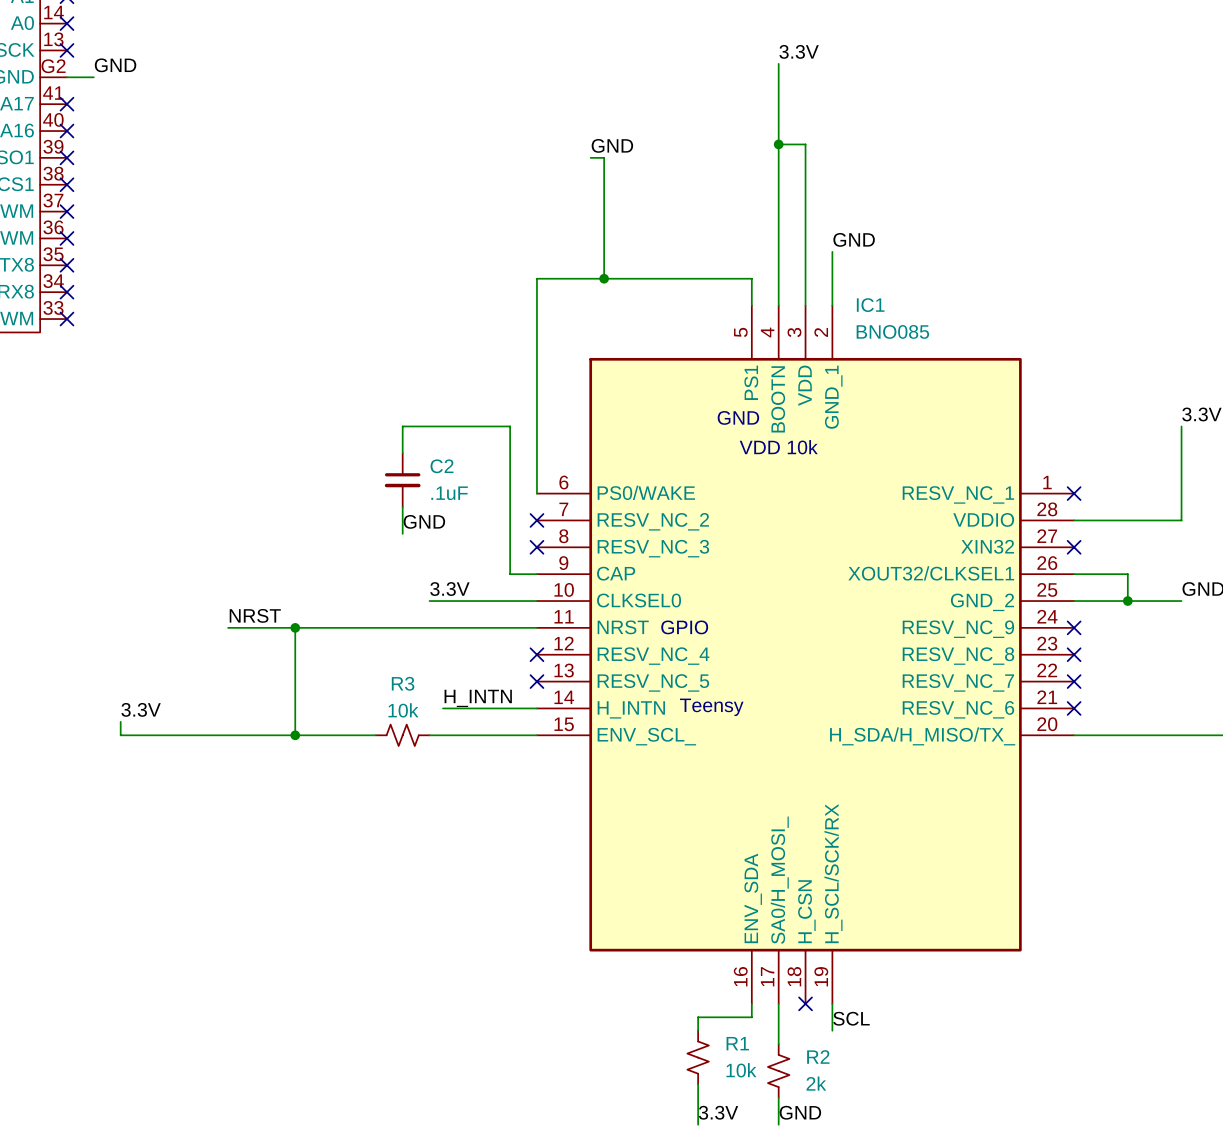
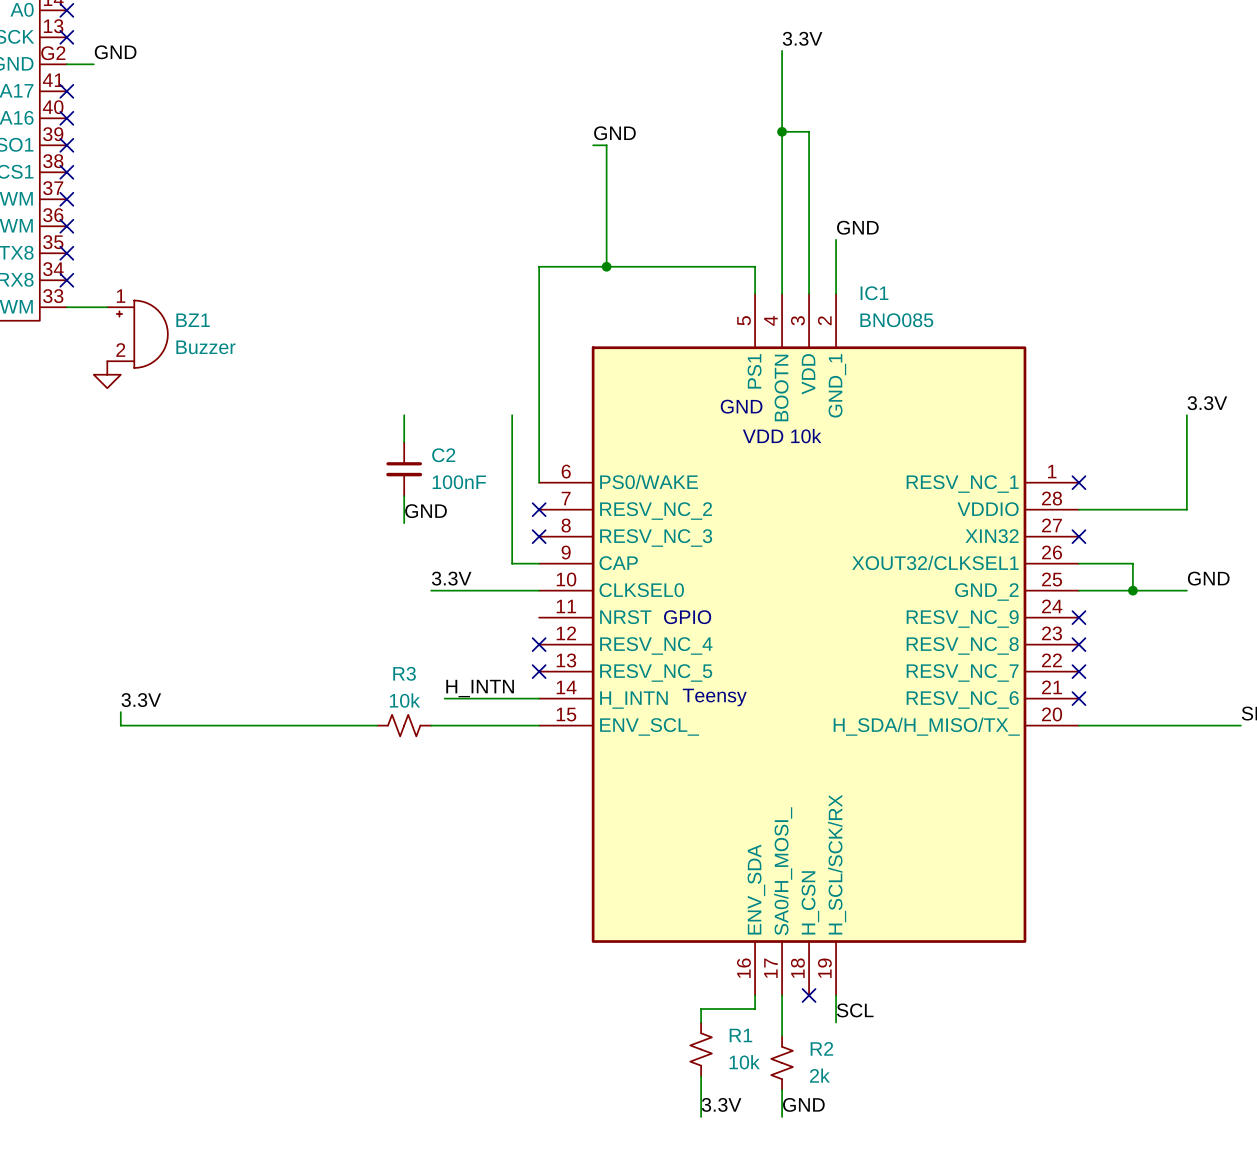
wire: none -> (66, 307) (107, 307)
no-connect mark: (66, 319) -> none
BZ1: none -> Buzzer (137, 334)
power symbol: none -> (107, 374)
wire: (402, 426) (510, 426) -> none
C2 value: .1uF (449, 493) -> 100nF (459, 482)
label: NRST (255, 615) -> none
wire: (228, 627) (536, 627) -> none
wire: (295, 627) (295, 735) -> none
junction: (295, 627) -> none
junction: (295, 735) -> none

